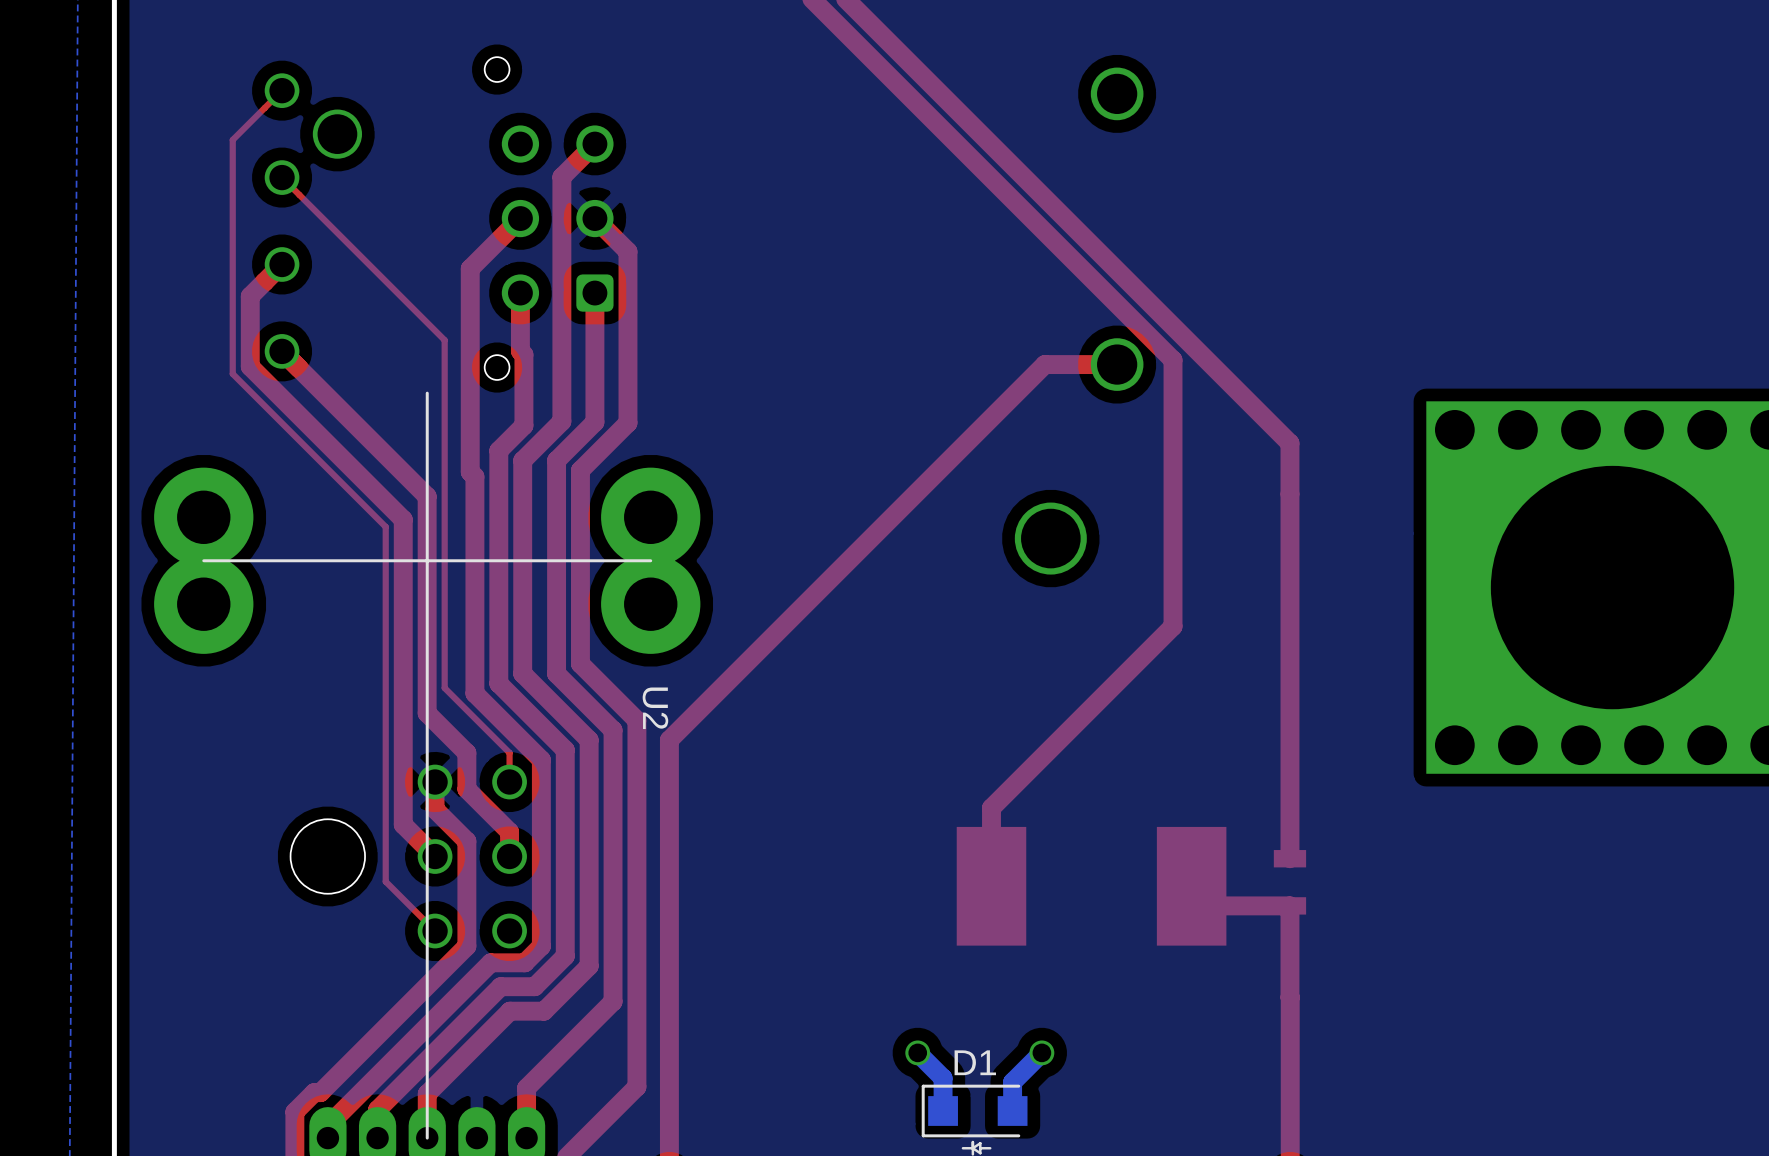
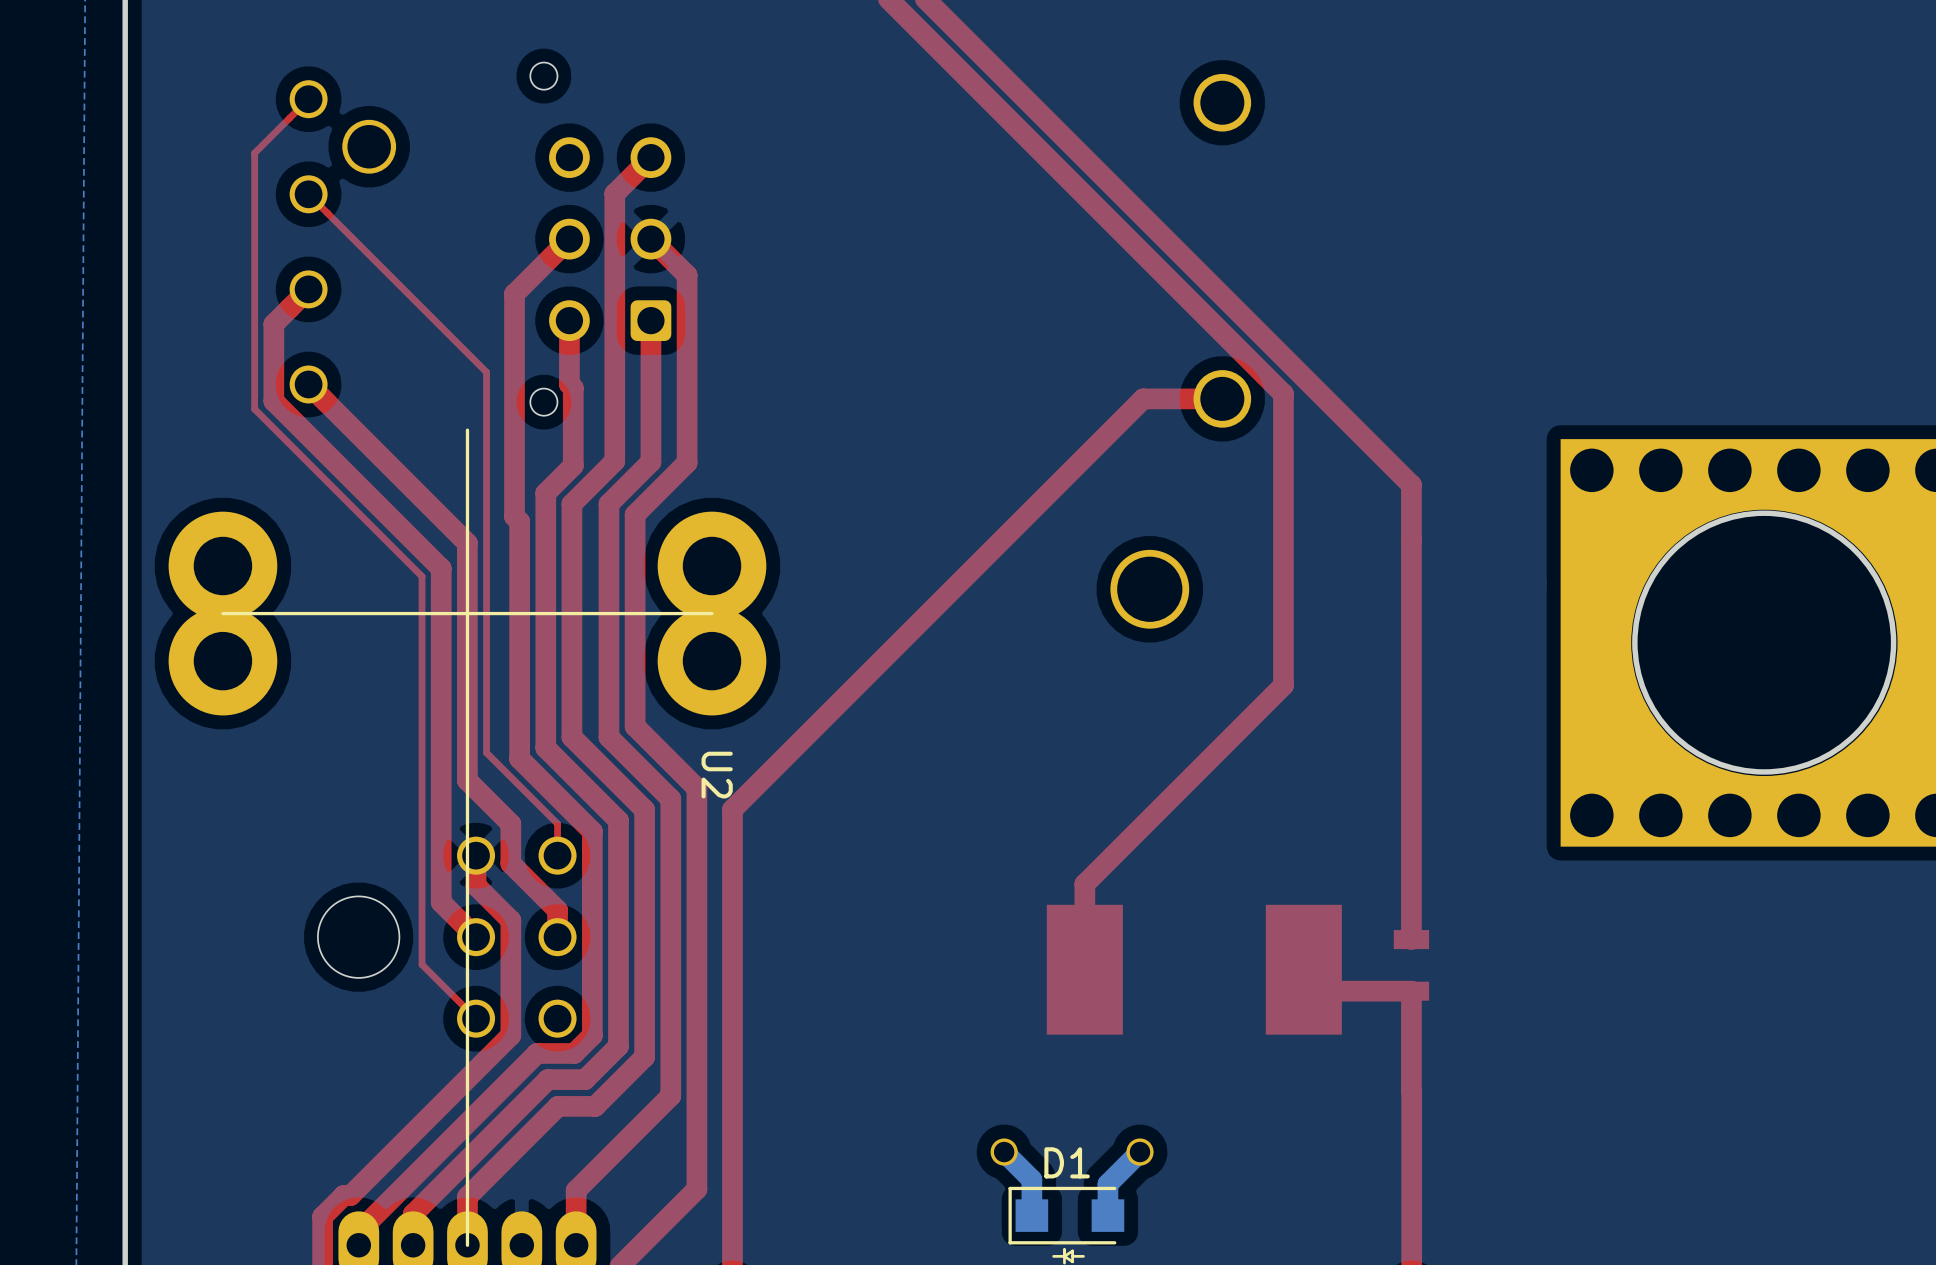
round board edge: none -> [1632, 510, 1897, 775]

